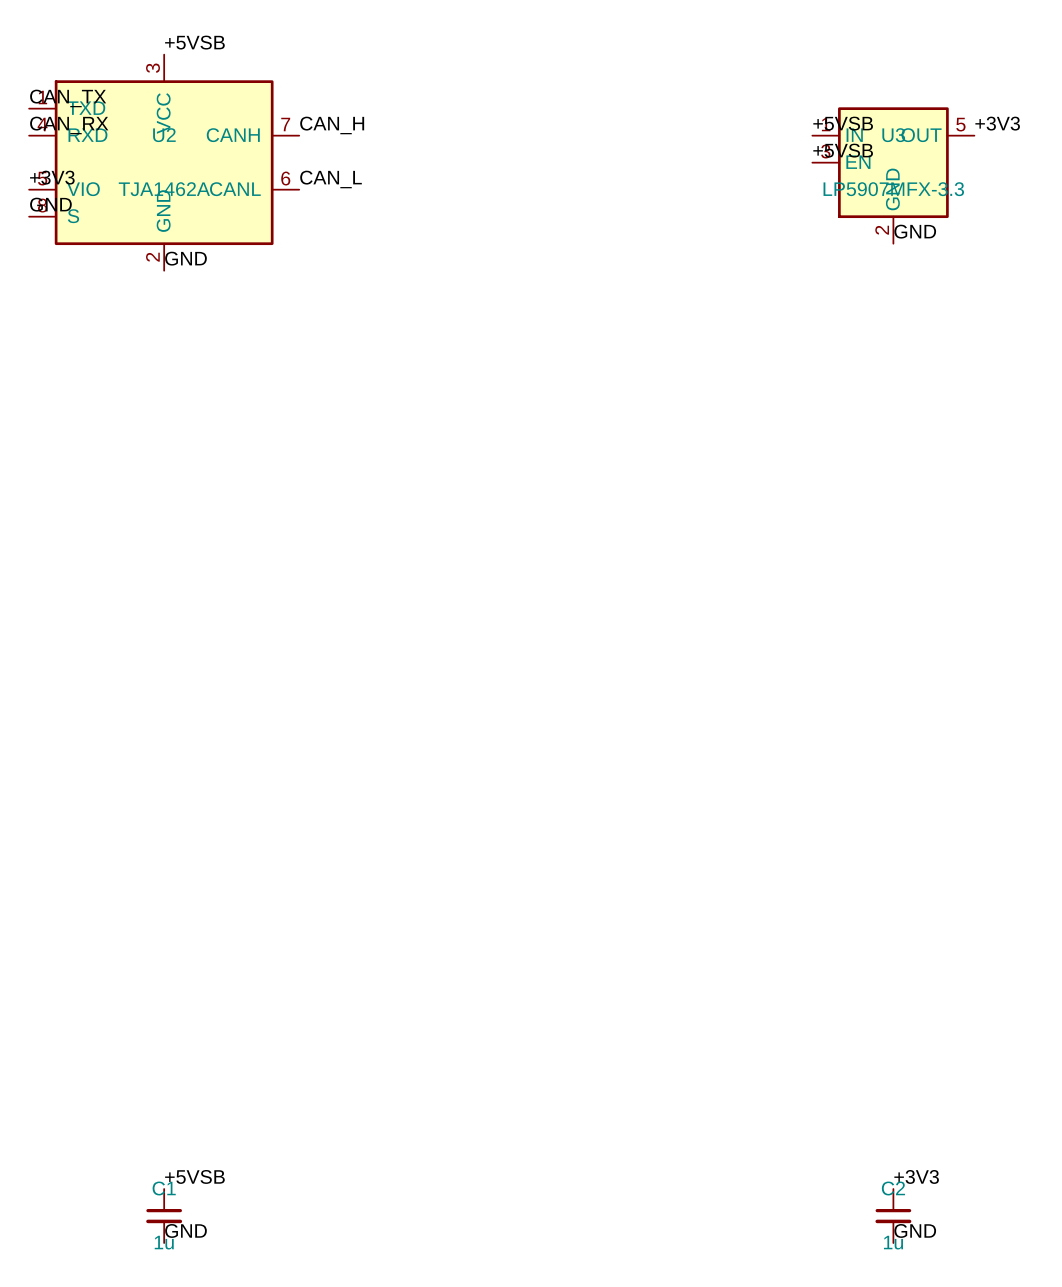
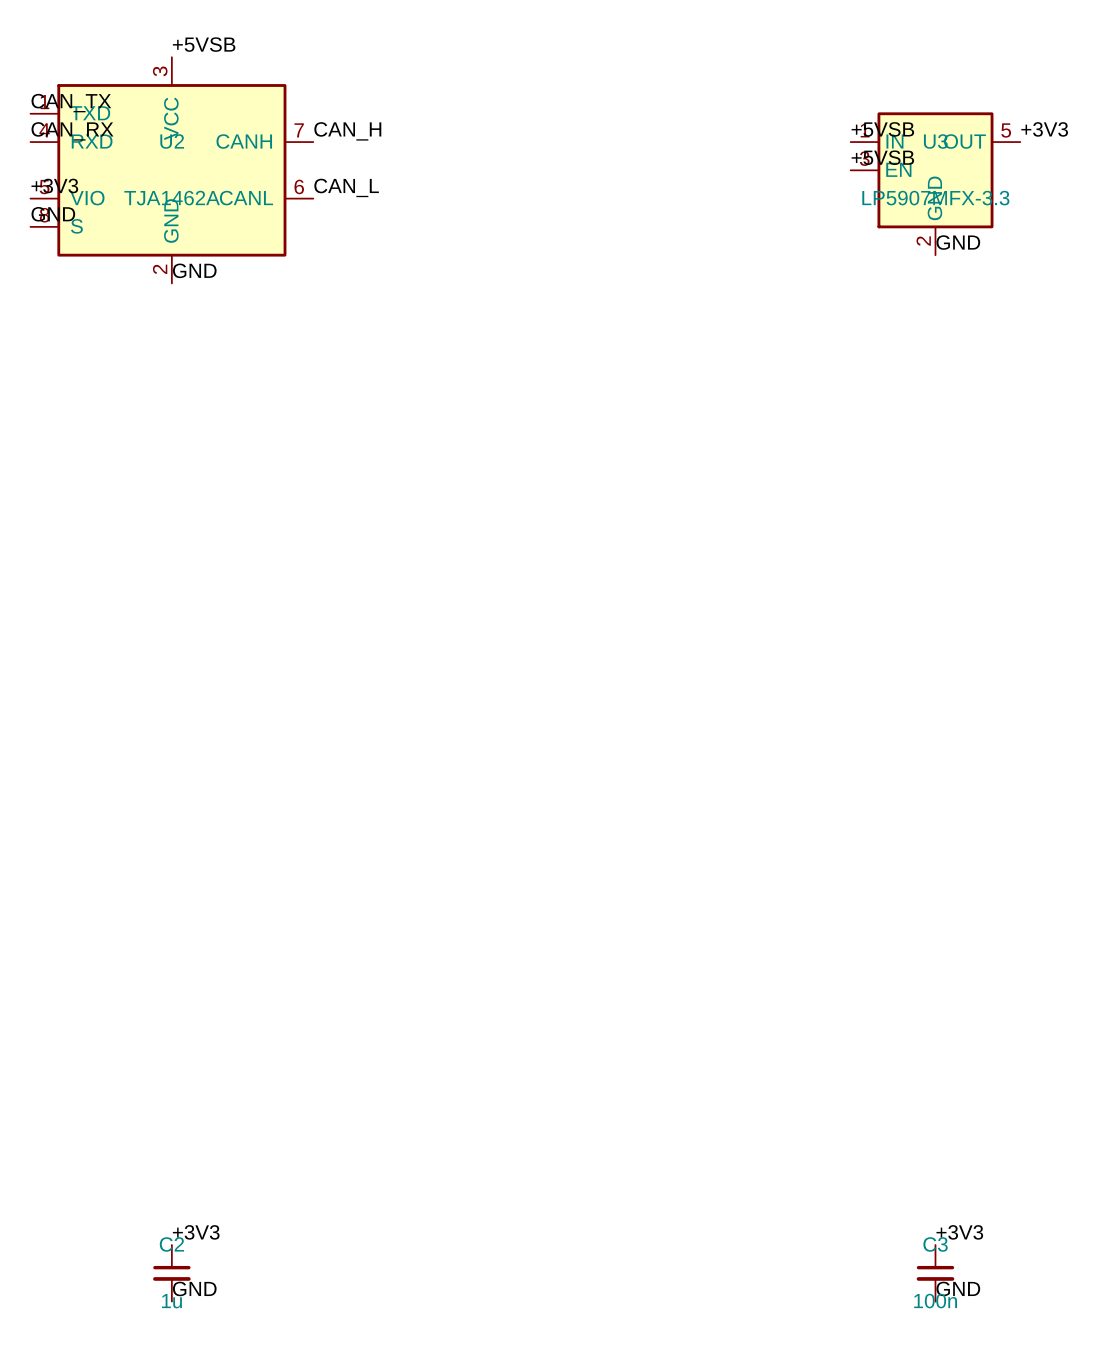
label: +5VSB (194, 1176) -> +3V3 (196, 1232)
C1 name: C1 (164, 1188) -> C2 (171, 1244)
C2 name: C2 (893, 1188) -> C3 (935, 1244)
C2 value: 1u (893, 1242) -> 100n (935, 1301)

